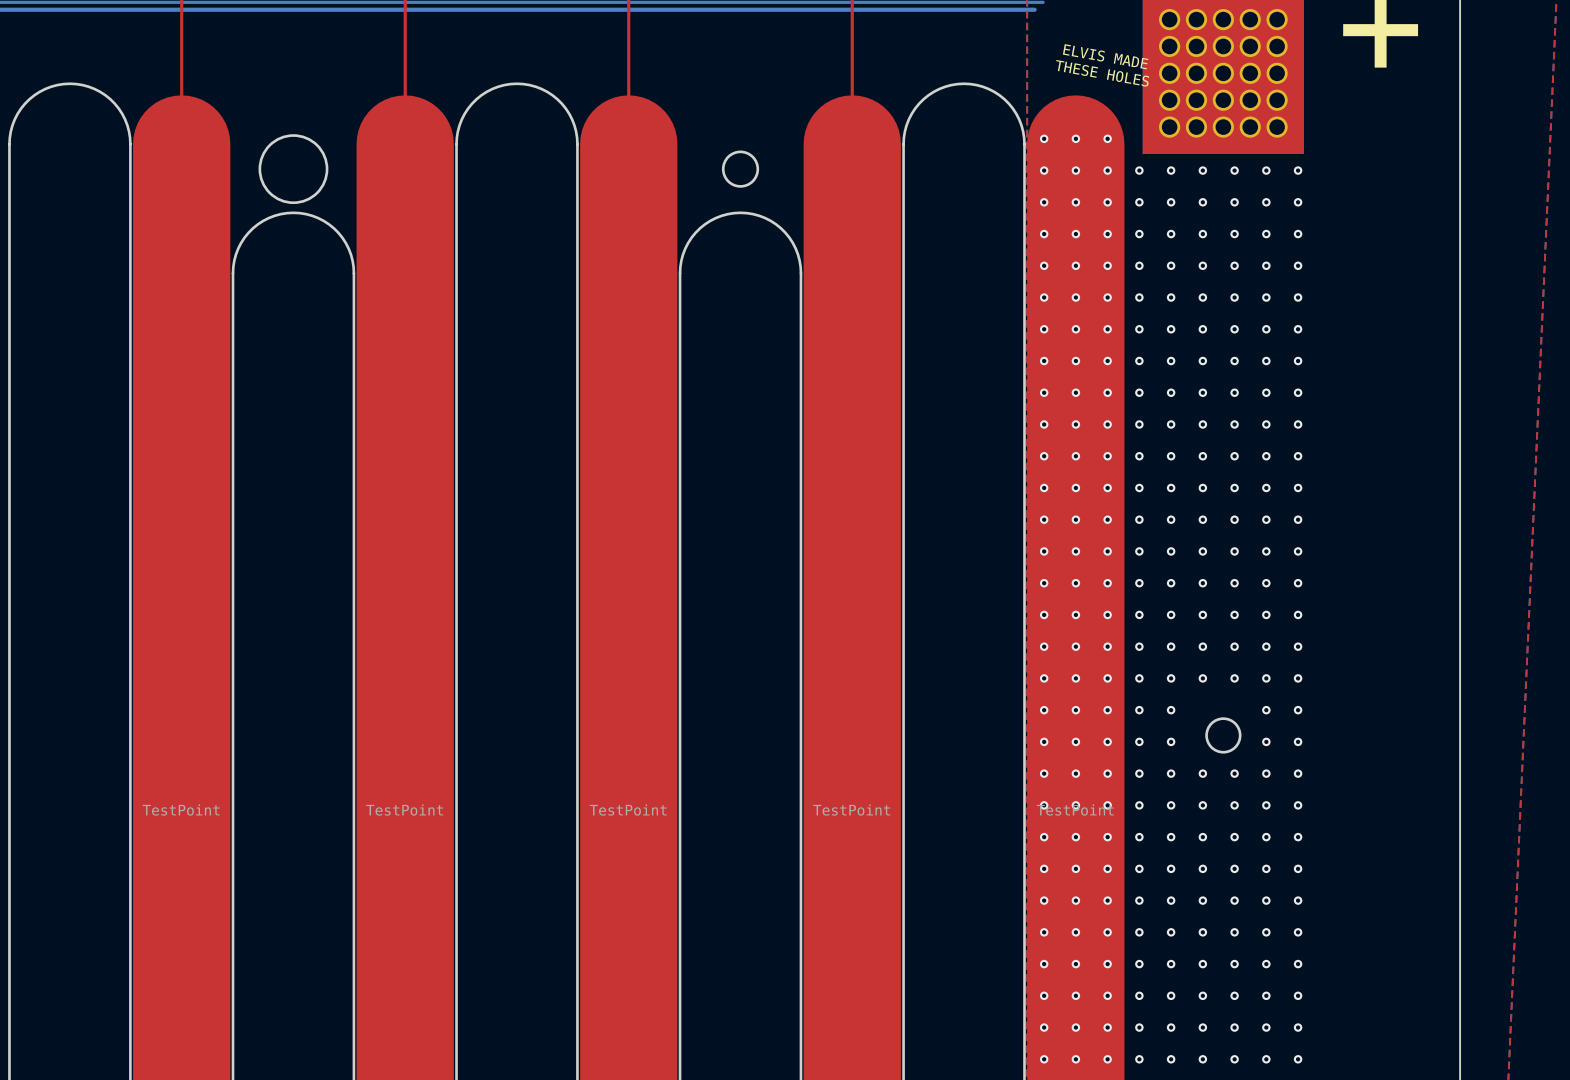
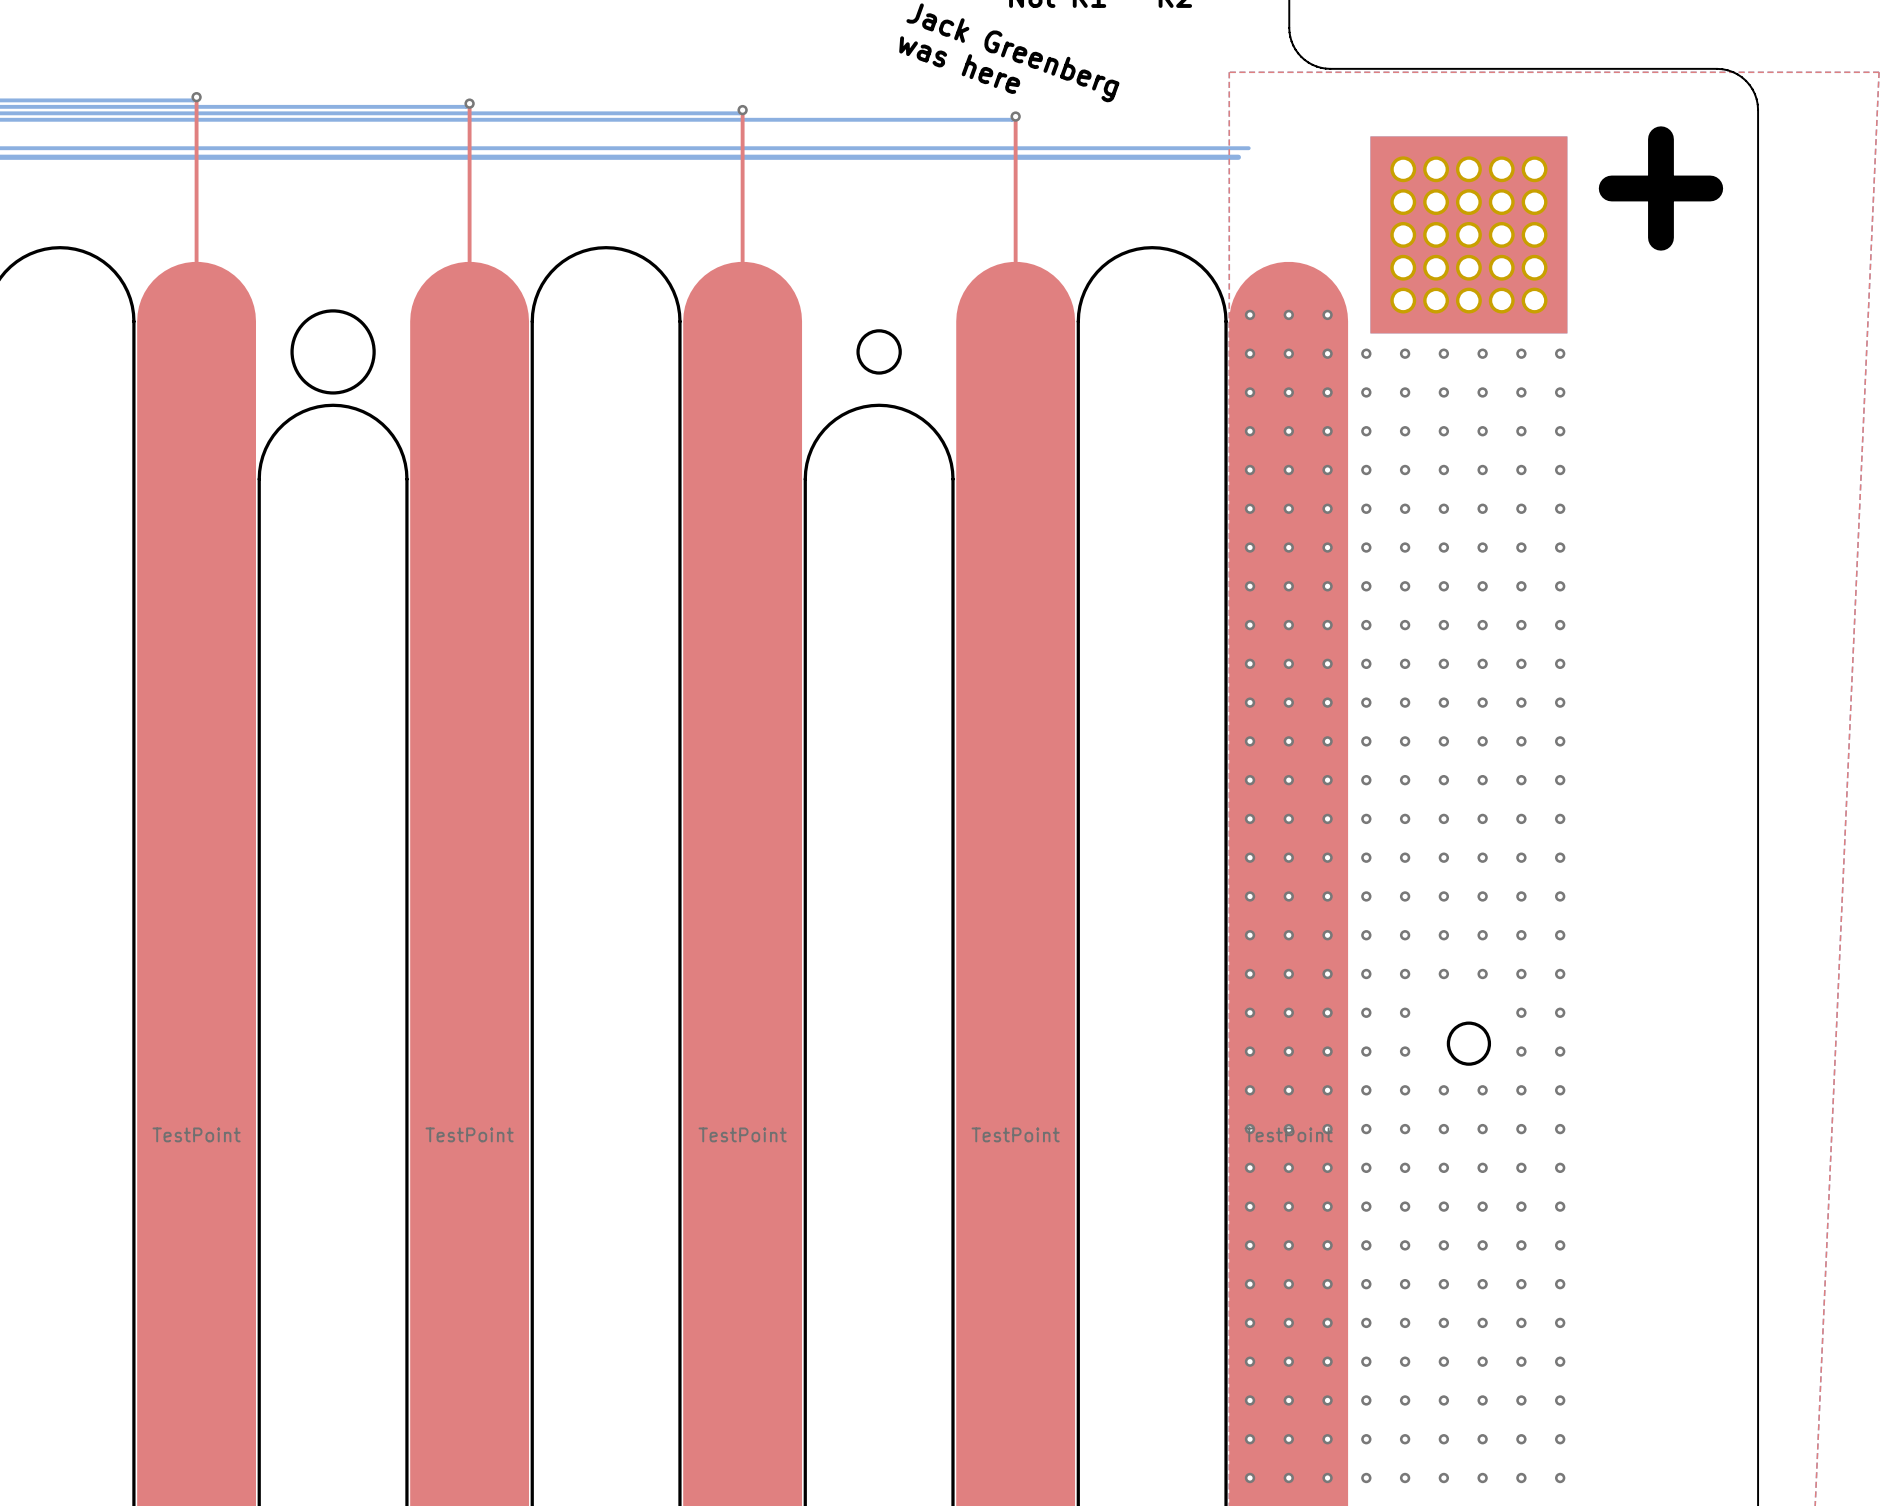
text: ELVIS MADE (1105, 56) -> none
text: THESE HOLES (1102, 73) -> none

